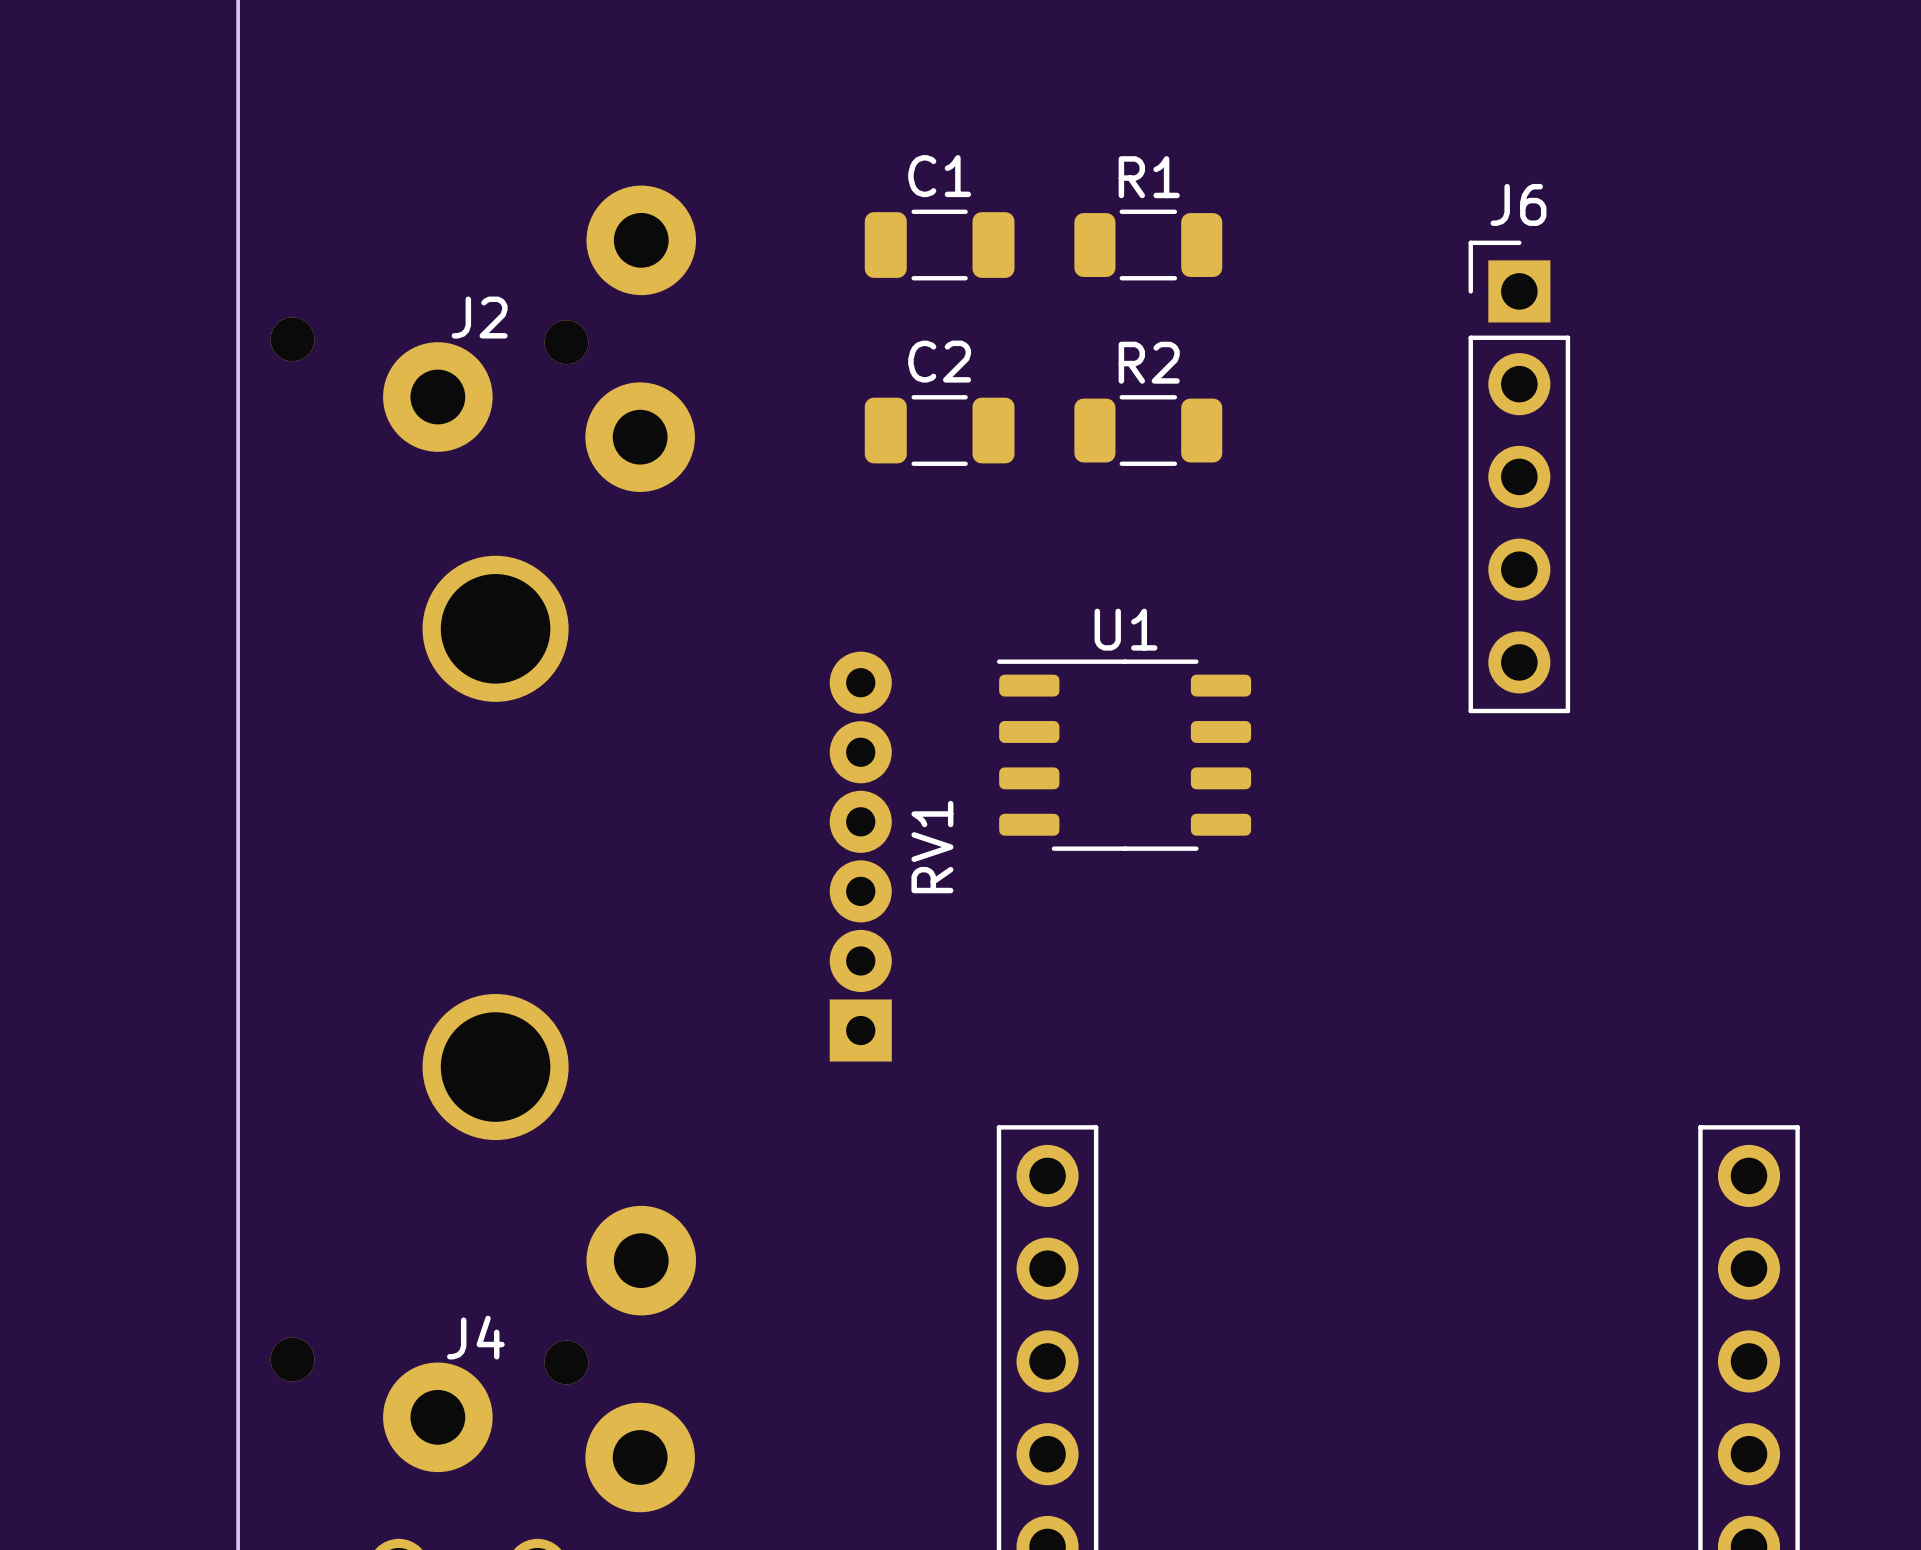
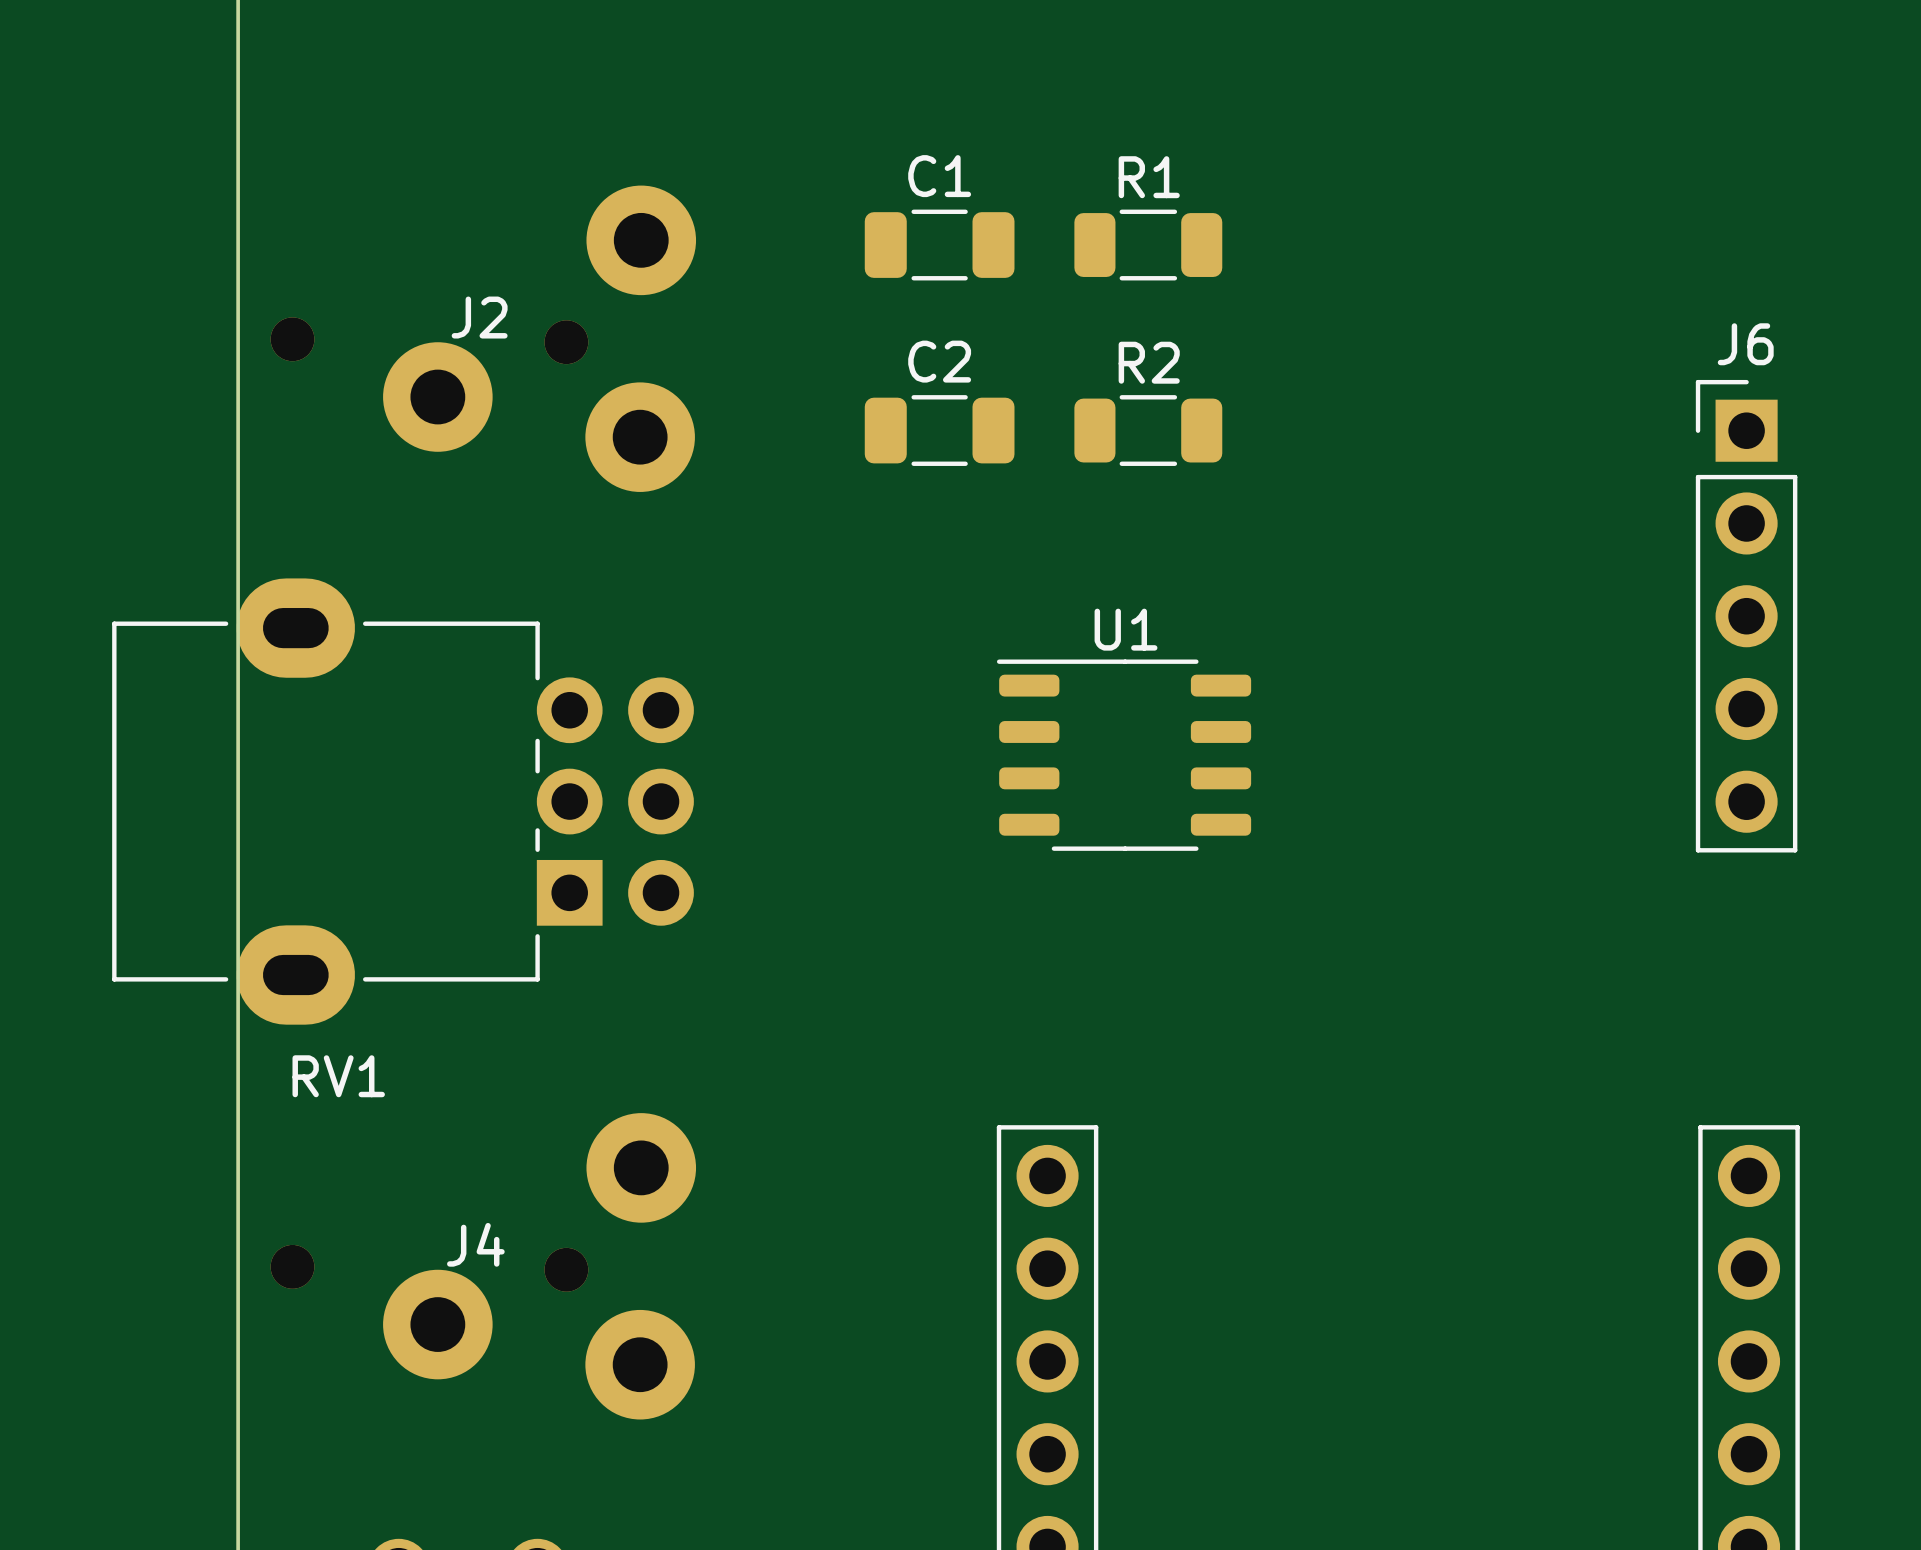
J6 position: (1519, 476) -> (1746, 616)
RV1 footprint: [422, 555, 892, 1141] -> [112, 578, 694, 1025]
RV1 name position: RV1 (932, 847) -> RV1 (338, 1076)
J4 position: (483, 1359) -> (483, 1266)

